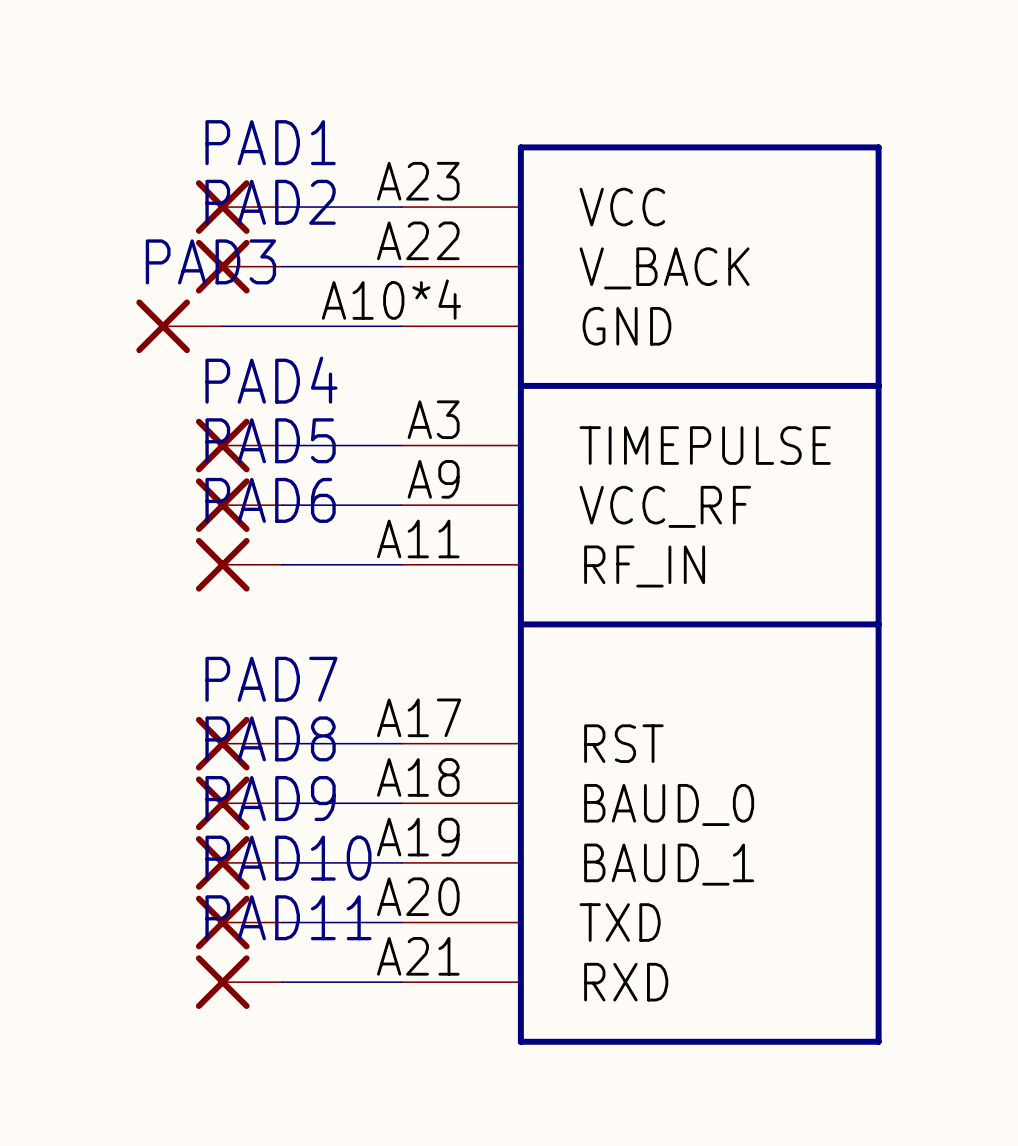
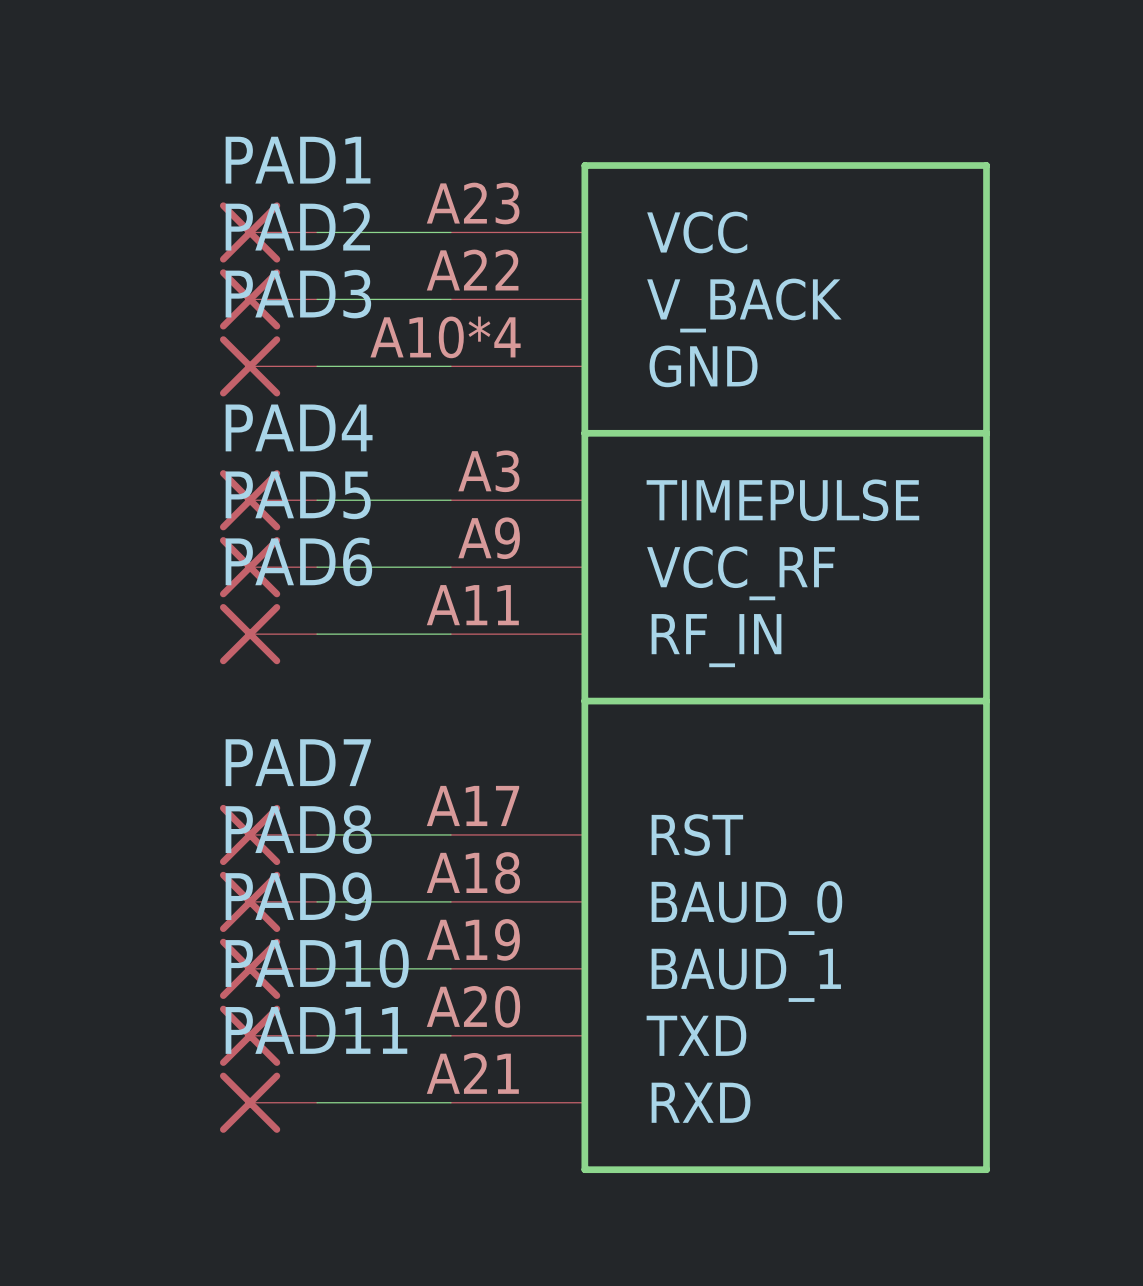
PAD3 position: (179, 326) -> (268, 366)

